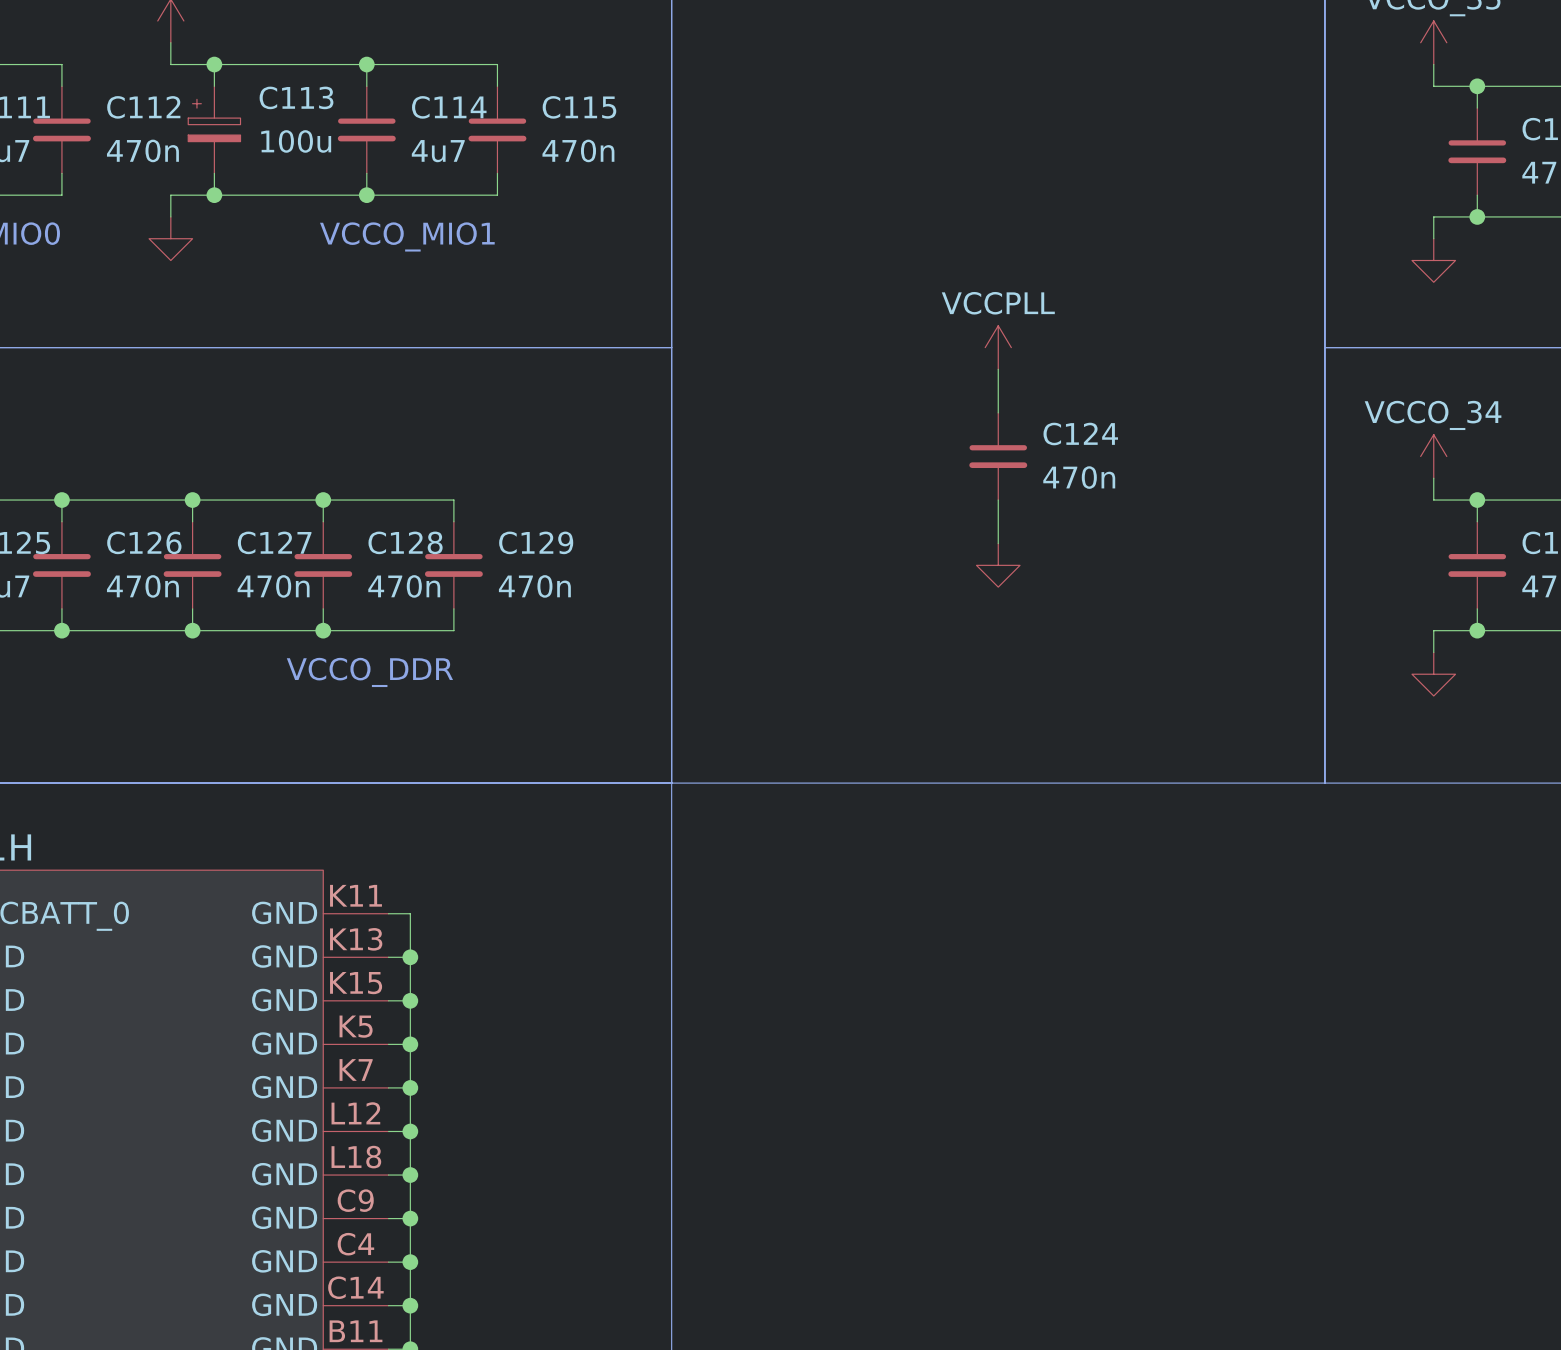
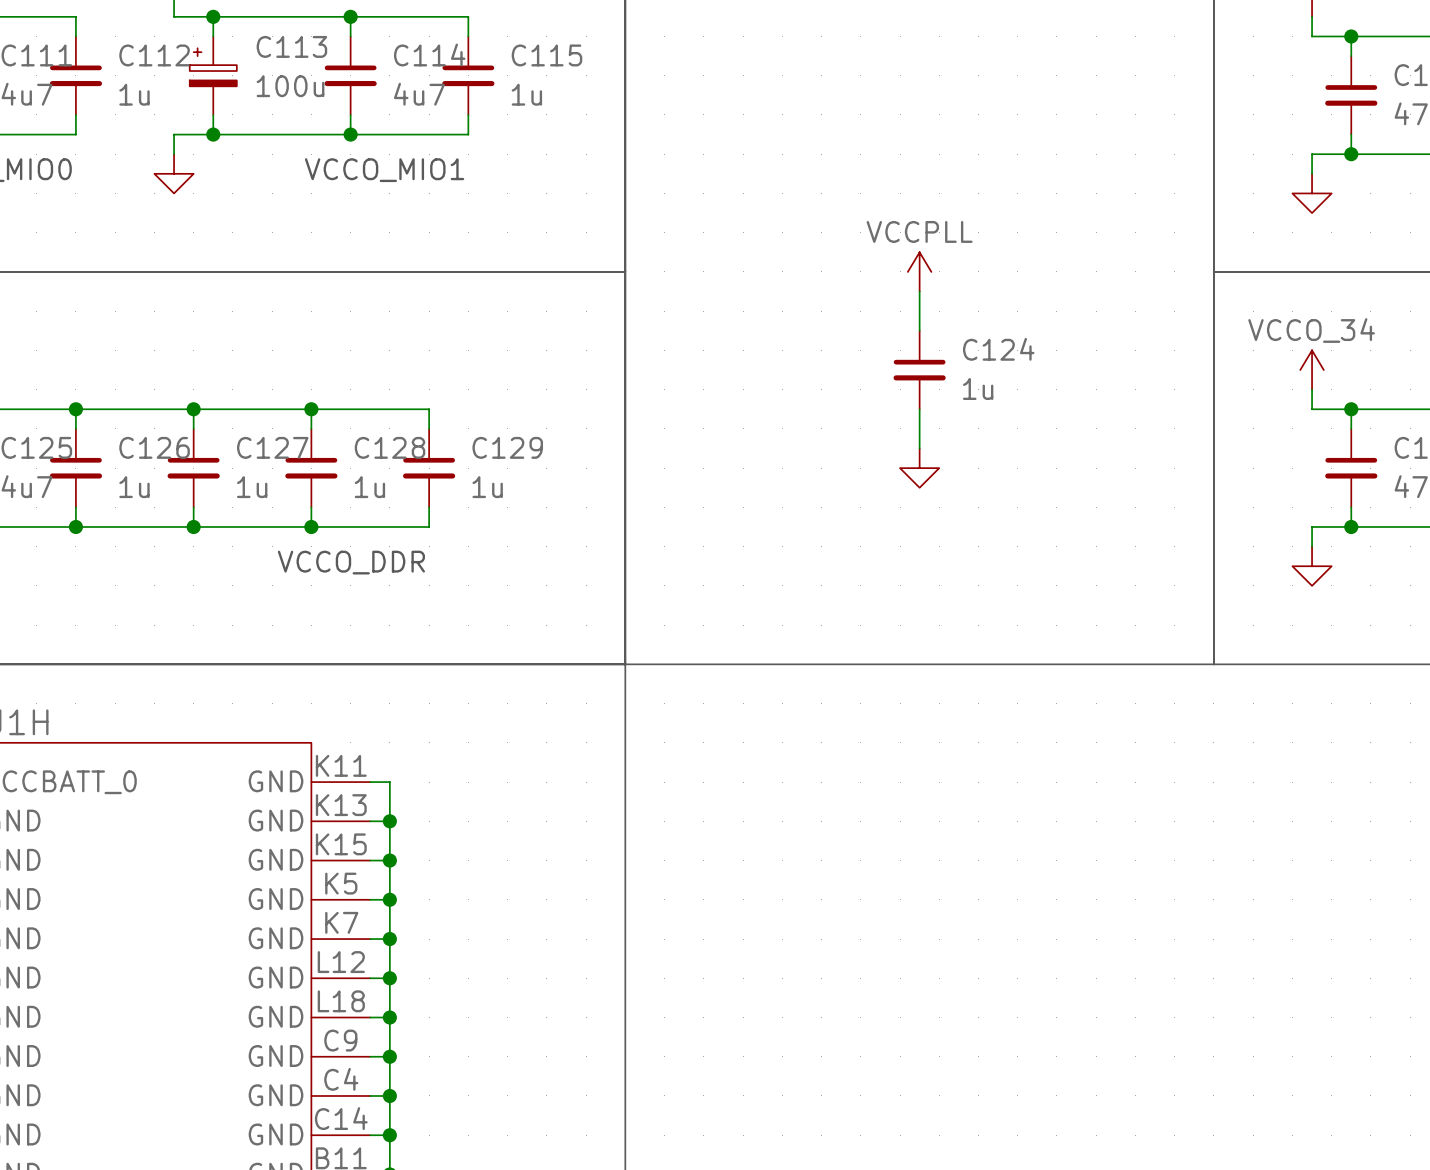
C112 value: 470n (142, 150) -> 1u (134, 94)
C115 value: 470n (578, 150) -> 1u (526, 94)
C124 value: 470n (1079, 477) -> 1u (978, 389)
C126 value: 470n (142, 586) -> 1u (134, 487)
C127 value: 470n (273, 586) -> 1u (252, 487)
C128 value: 470n (404, 586) -> 1u (369, 487)
C129 value: 470n (534, 586) -> 1u (487, 487)

